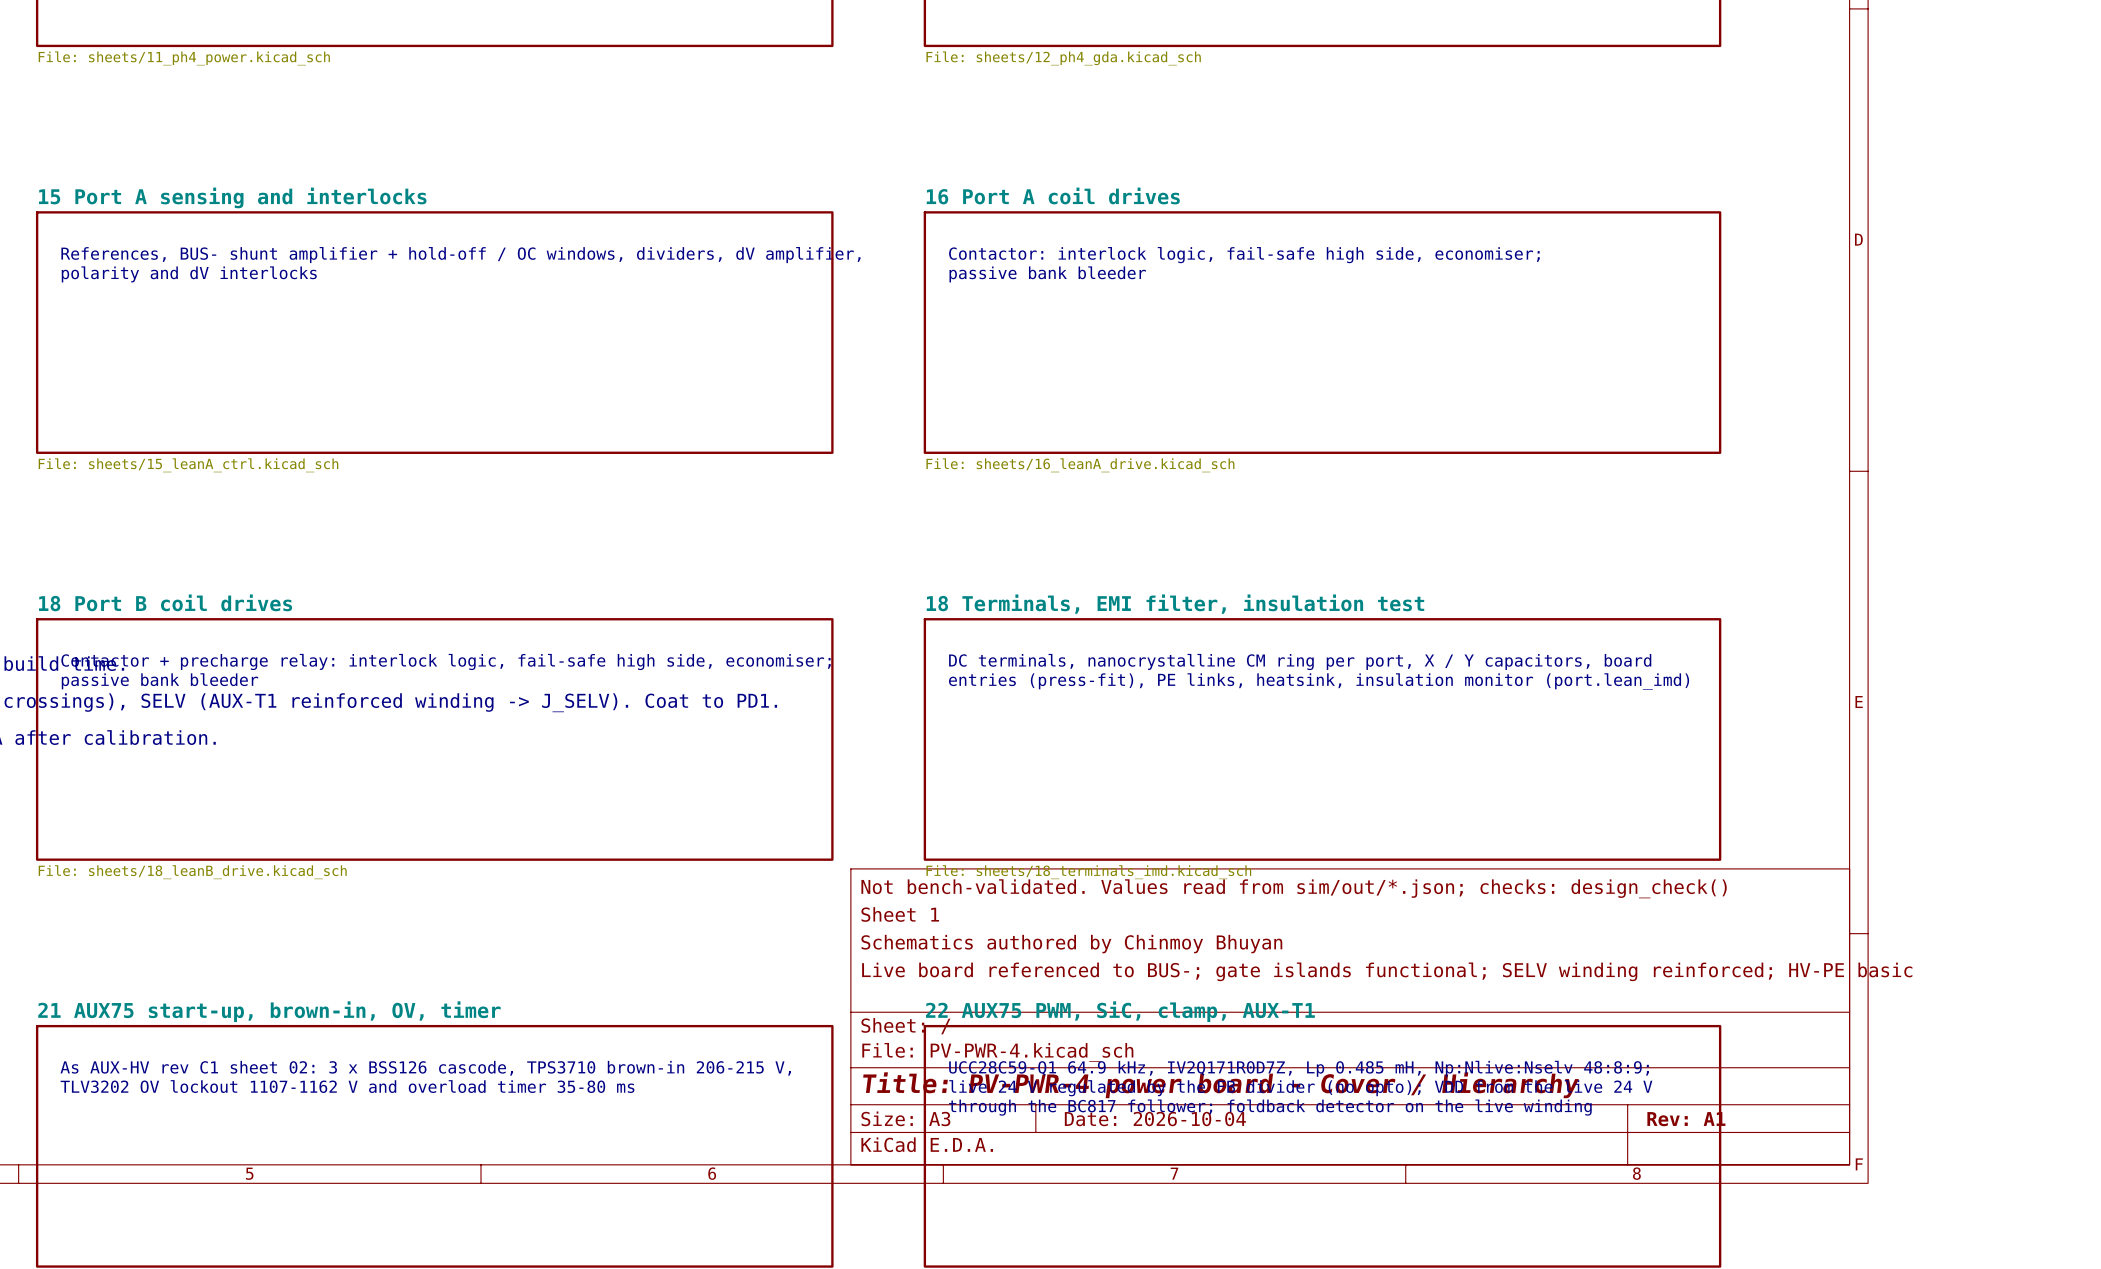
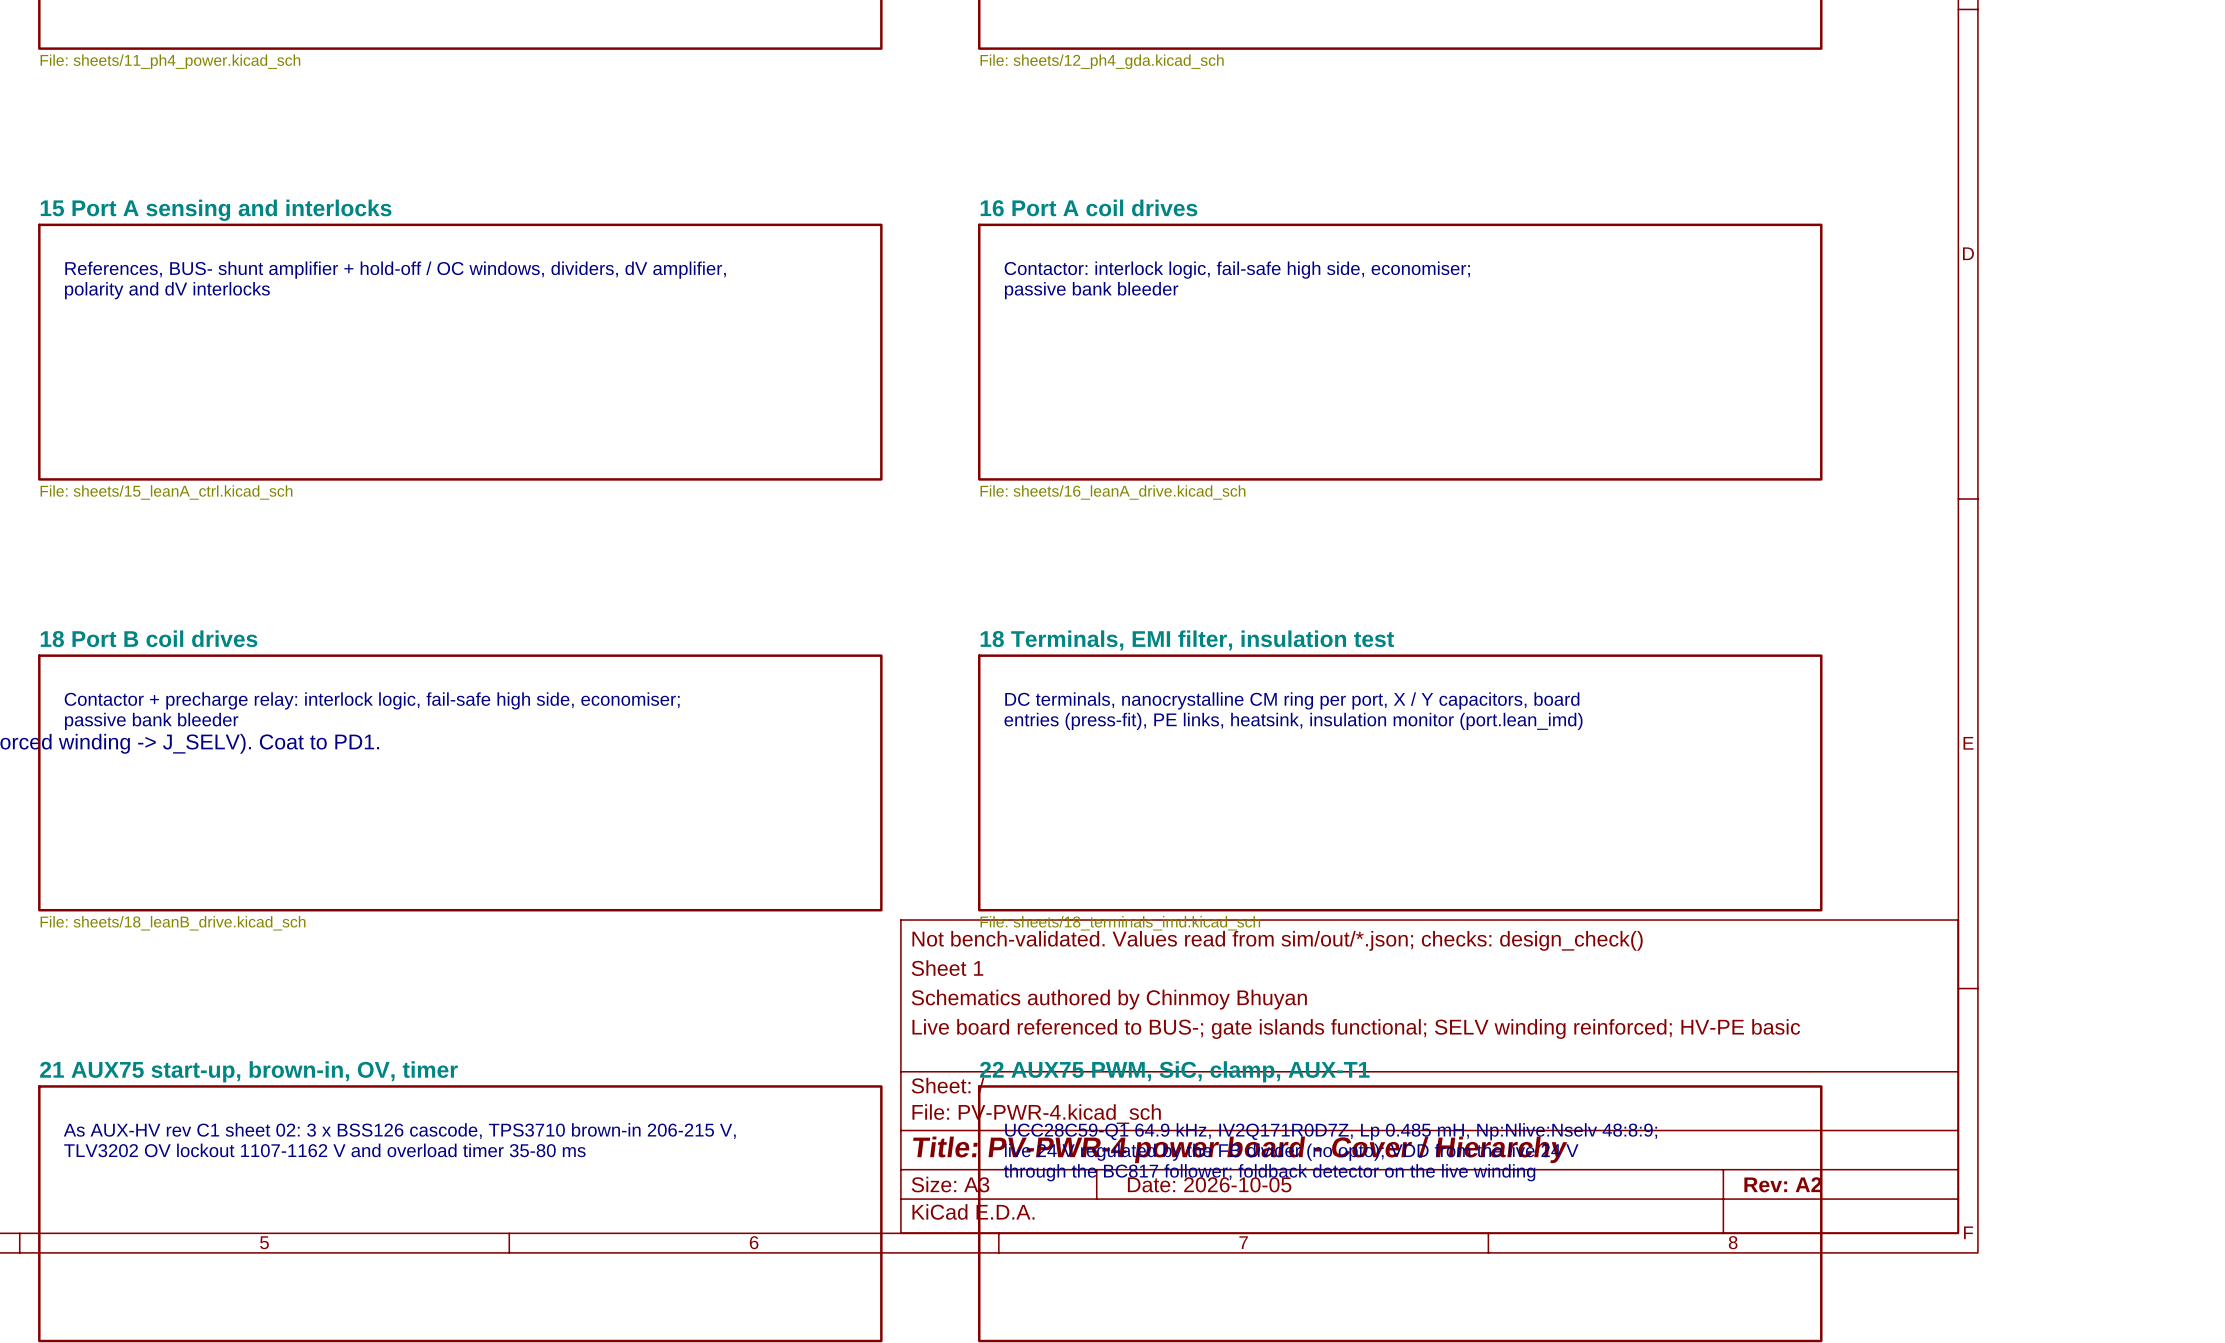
title block: Date: 2026-10-04 (1155, 1119) -> Date: 2026-10-05 (1209, 1184)
title block: Rev: A1 (1686, 1119) -> Rev: A2 (1782, 1184)

